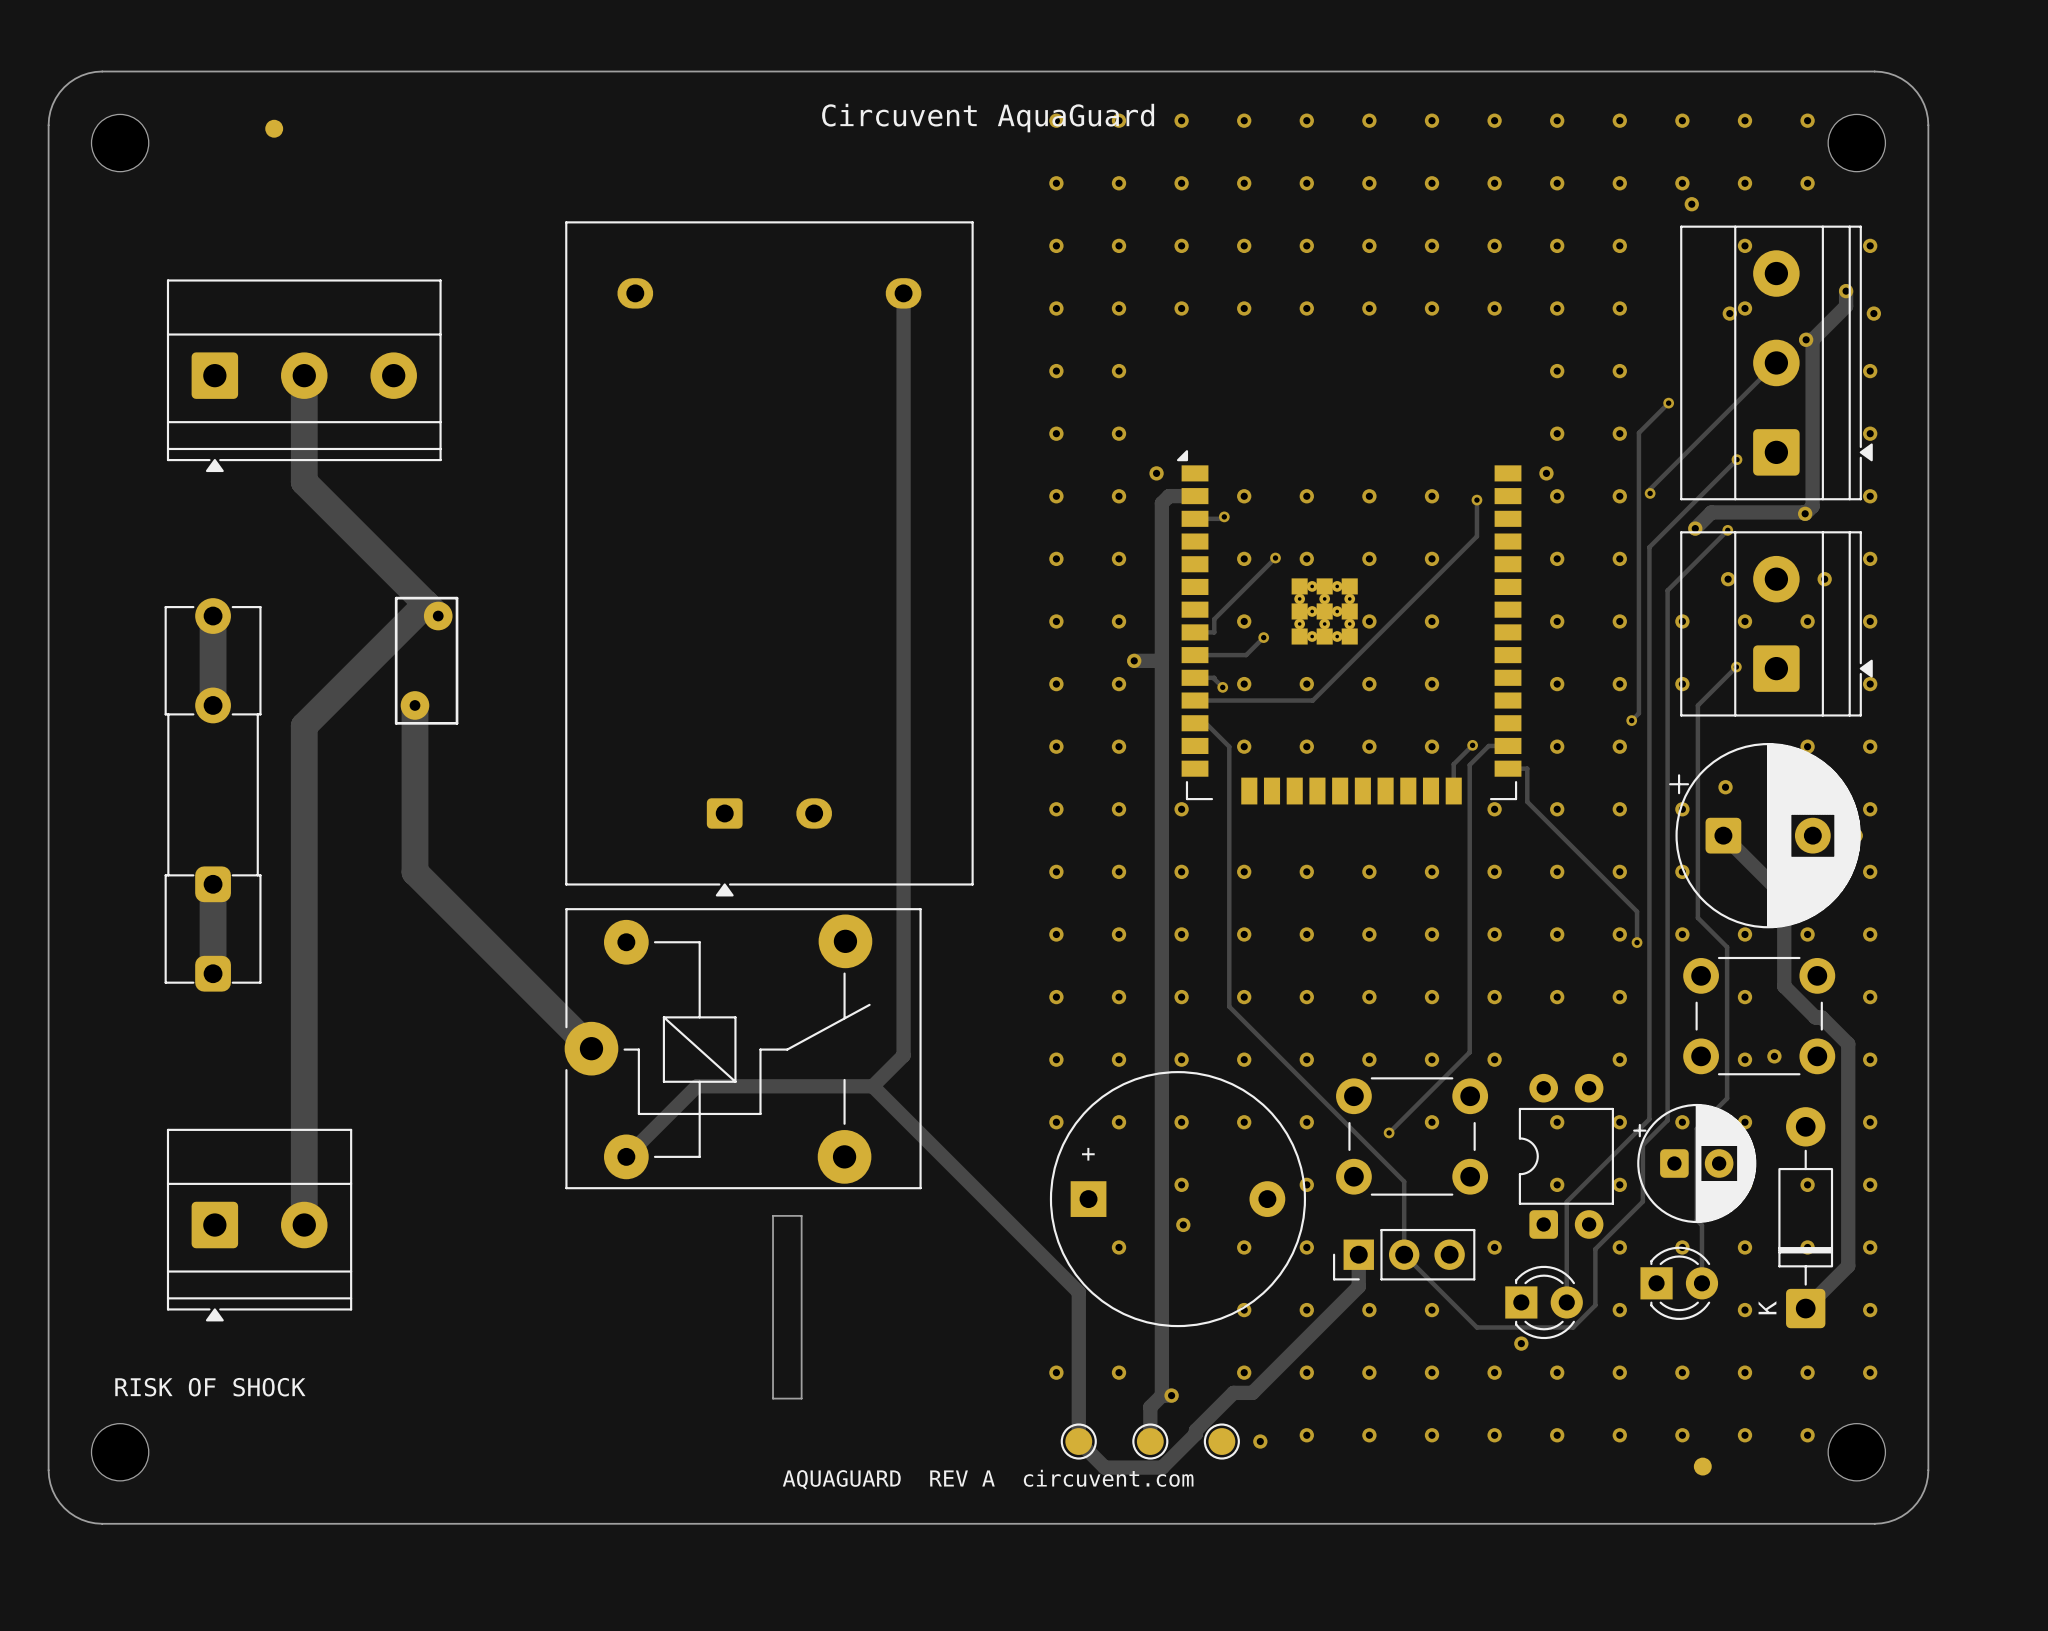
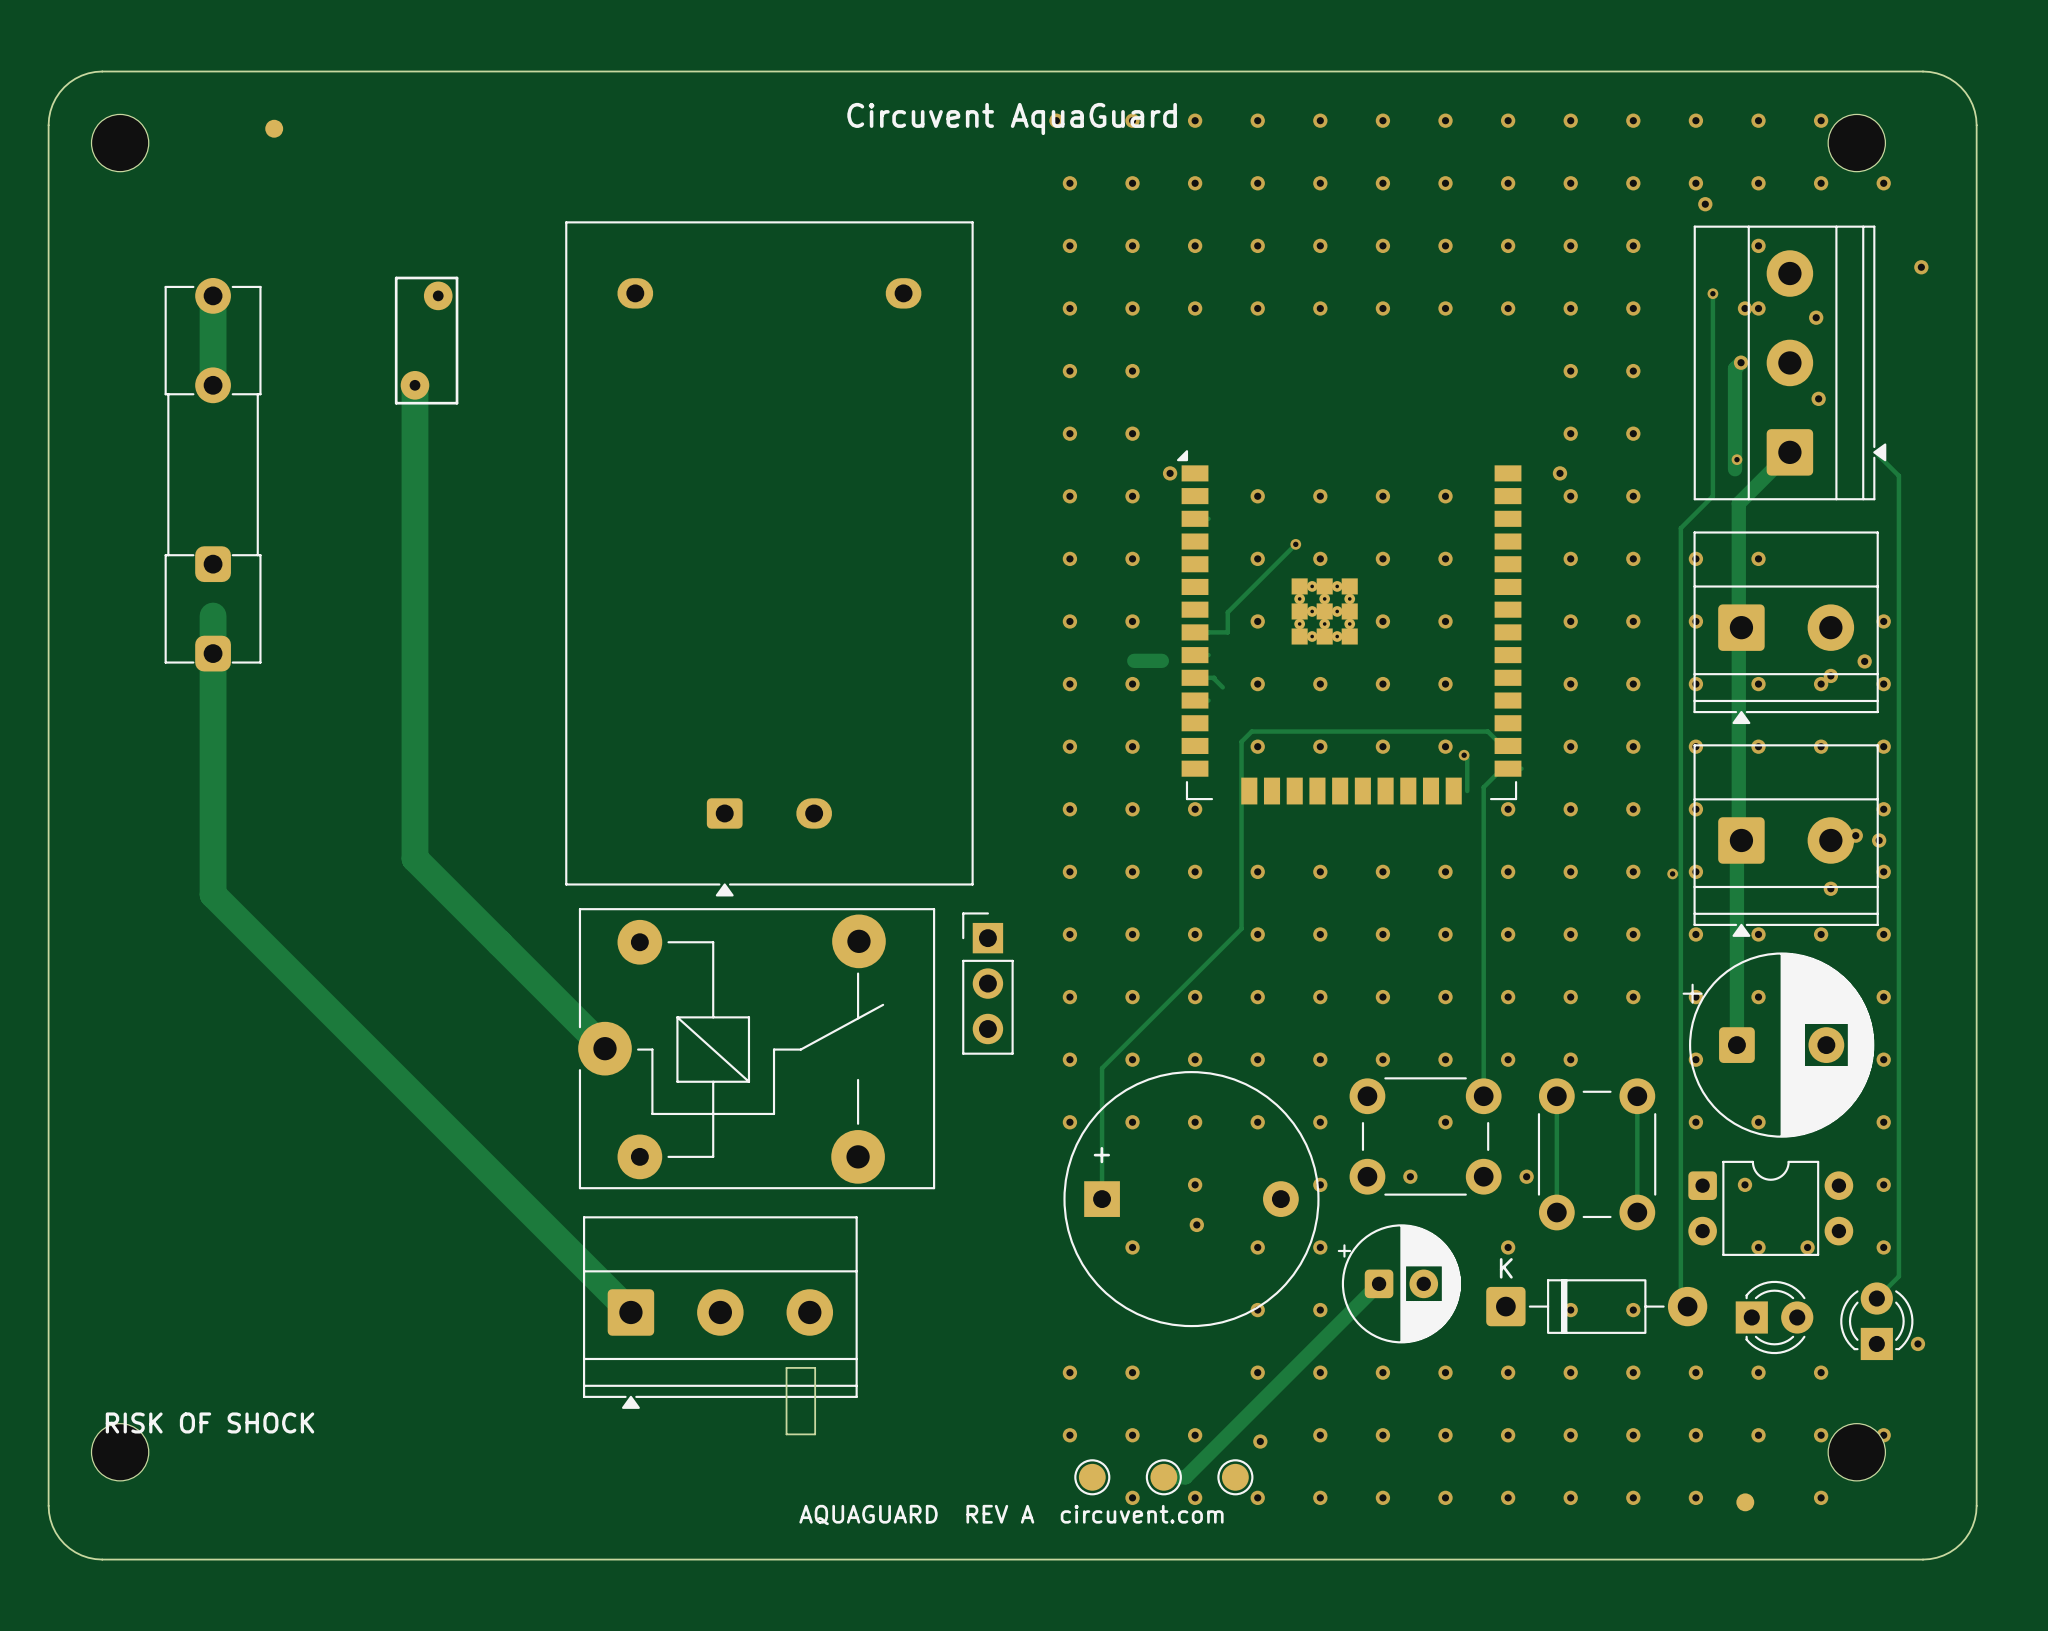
board edge: (1874, 71) (1895, 75) (1912, 87) (1924, 104) (1928, 125) (1928, 1470) (1926, 1484) (1921, 1496) (1907, 1512) (1888, 1521) (1874, 1523) (102, 1523) (81, 1519) (64, 1508) (52, 1490) (48, 1470) -> (1874, 71) (1929, 71) (1949, 78) (1960, 87) (1969, 98) (1974, 111) (1976, 125) (1976, 1505) (1972, 1526) (1965, 1538) (1955, 1548) (1943, 1555) (1922, 1559) (102, 1559) (88, 1557) (75, 1552) (64, 1543) (55, 1532) (49, 1512) (48, 1470)
text position: Circuvent AquaGuard (988, 118) -> Circuvent AquaGuard (1012, 118)
via position: (1119, 120) -> (1132, 120)
via position: (1181, 120) -> (1195, 120)
via position: (1244, 120) -> (1257, 120)
via position: (1306, 120) -> (1320, 120)
via position: (1369, 120) -> (1382, 120)
via position: (1432, 120) -> (1445, 120)
via position: (1494, 120) -> (1508, 120)
via position: (1557, 120) -> (1570, 120)
via position: (1619, 120) -> (1633, 120)
via position: (1682, 120) -> (1695, 120)
via position: (1744, 120) -> (1758, 120)
via position: (1807, 120) -> (1821, 120)
via position: (1056, 183) -> (1069, 183)
via position: (1119, 183) -> (1132, 183)
via position: (1181, 183) -> (1195, 183)
via position: (1244, 183) -> (1257, 183)
via position: (1306, 183) -> (1320, 183)
via position: (1369, 183) -> (1382, 183)
via position: (1432, 183) -> (1445, 183)
via position: (1494, 183) -> (1508, 183)
via position: (1557, 183) -> (1570, 183)
via position: (1619, 183) -> (1633, 183)
via position: (1682, 183) -> (1695, 183)
via position: (1744, 183) -> (1758, 183)
via position: (1807, 183) -> (1821, 183)
via: none -> (1883, 183)
via position: (1691, 204) -> (1705, 204)
via position: (1056, 245) -> (1069, 245)
via position: (1119, 245) -> (1132, 245)
via position: (1181, 245) -> (1195, 245)
via position: (1244, 245) -> (1257, 245)
via position: (1306, 245) -> (1320, 245)
via position: (1369, 245) -> (1382, 245)
via position: (1432, 245) -> (1445, 245)
via position: (1494, 245) -> (1508, 245)
via position: (1557, 245) -> (1570, 245)
via position: (1619, 245) -> (1633, 245)
via position: (1744, 245) -> (1758, 245)
via: (1870, 245) -> none
via: none -> (1921, 267)
track: (1846, 291) (1846, 306) (1812, 339) -> none
via: (1846, 291) -> none
track: (903, 293) (903, 1055) (872, 1086) -> none
track: none -> (1712, 293) (1712, 496) (1680, 528) (1680, 1299) (1687, 1306)
via: none -> (1712, 293)
track: none -> (213, 295) (213, 385)
via position: (1056, 308) -> (1069, 308)
via position: (1119, 308) -> (1132, 308)
via position: (1181, 308) -> (1195, 308)
via position: (1244, 308) -> (1257, 308)
via position: (1306, 308) -> (1320, 308)
via position: (1369, 308) -> (1382, 308)
via position: (1432, 308) -> (1445, 308)
via position: (1494, 308) -> (1508, 308)
via position: (1557, 308) -> (1570, 308)
via position: (1619, 308) -> (1633, 308)
via: none -> (1758, 308)
via: (1729, 313) -> none
via: (1873, 313) -> none
via: none -> (1816, 317)
via: (1806, 339) -> none
track: (1812, 339) (1812, 506) (1805, 513) (1711, 512) (1695, 528) -> none
track: none -> (1741, 362) (1735, 368) (1735, 469)
via: none -> (1741, 362)
track: (1776, 362) (1650, 489) (1650, 493) -> none
part position: (1776, 362) -> (1789, 362)
via position: (1056, 371) -> (1069, 371)
via position: (1119, 371) -> (1132, 371)
via position: (1557, 371) -> (1570, 371)
via position: (1619, 371) -> (1633, 371)
via: (1870, 371) -> none
track: (304, 375) (304, 482) (438, 616) -> none
part: (304, 375) -> none
track: none -> (414, 385) (414, 705)
via: none -> (1818, 398)
track: (1668, 403) (1638, 432) (1638, 713) (1631, 720) -> none
via: (1668, 403) -> none
via position: (1056, 433) -> (1069, 433)
via position: (1119, 433) -> (1132, 433)
via position: (1557, 433) -> (1570, 433)
via position: (1619, 433) -> (1633, 433)
via: (1870, 433) -> none
track: none -> (1789, 452) (1738, 503) (1738, 837) (1741, 840) (1736, 844) (1736, 1045)
track: none -> (1877, 454) (1898, 475) (1898, 1276) (1876, 1298)
track: (1737, 459) (1649, 547) (1649, 1119) (1566, 1201) (1566, 1302) -> none
via position: (1156, 473) -> (1170, 473)
via position: (1546, 473) -> (1559, 473)
via: (1650, 493) -> none
via position: (1056, 496) -> (1069, 496)
via position: (1119, 496) -> (1132, 496)
track: (1195, 496) (1169, 496) (1161, 503) (1161, 1395) -> none
via position: (1244, 496) -> (1257, 496)
via position: (1306, 496) -> (1320, 496)
via position: (1369, 496) -> (1382, 496)
via position: (1432, 496) -> (1445, 496)
via position: (1557, 496) -> (1570, 496)
via position: (1619, 496) -> (1633, 496)
via: (1870, 496) -> none
track: (1476, 500) (1476, 536) (1312, 700) (1208, 700) -> none
via: (1476, 500) -> none
via: (1805, 513) -> none
track: (1224, 516) (1222, 518) (1208, 518) -> none
via: (1224, 516) -> none
via: (1695, 528) -> none
track: (1727, 530) (1667, 590) (1667, 1120) (1642, 1145) (1642, 1201) (1595, 1249) (1595, 1305) (1573, 1327) (1476, 1327) (1404, 1254) (1404, 1181) (1229, 1006) (1229, 746) (1205, 723) (1195, 723) -> none
via: (1727, 530) -> none
via position: (1056, 558) -> (1069, 558)
via position: (1119, 558) -> (1132, 558)
via position: (1244, 558) -> (1257, 558)
track: (1275, 558) (1214, 619) (1214, 632) -> (1295, 544) (1227, 612) (1227, 632) (1214, 632)
via position: (1275, 558) -> (1295, 544)
via position: (1306, 558) -> (1320, 558)
via position: (1369, 558) -> (1382, 558)
via position: (1432, 558) -> (1445, 558)
via position: (1557, 558) -> (1570, 558)
via position: (1619, 558) -> (1633, 558)
via: none -> (1695, 558)
via: none -> (1758, 558)
via: (1870, 558) -> none
via: (1728, 579) -> none
via: (1824, 579) -> none
track: (426, 603) (304, 725) (304, 1225) -> none
via position: (1056, 621) -> (1069, 621)
via position: (1119, 621) -> (1132, 621)
via position: (1244, 621) -> (1257, 621)
via position: (1369, 621) -> (1382, 621)
via position: (1432, 621) -> (1445, 621)
via position: (1557, 621) -> (1570, 621)
via position: (1619, 621) -> (1633, 621)
via position: (1682, 621) -> (1695, 621)
via: (1744, 621) -> none
via: (1807, 621) -> none
via position: (1870, 621) -> (1883, 621)
part rotation: 0° (1776, 623) -> 90° clockwise (1786, 627)
track: (1263, 637) (1246, 655) (1208, 655) -> none
via: (1263, 637) -> none
part position: (426, 660) -> (426, 340)
via: (1134, 660) -> none
via: none -> (1864, 661)
track: (1736, 667) (1697, 705) (1697, 917) (1727, 947) (1727, 1098) (1696, 1128) (1696, 1220) (1701, 1225) (1701, 1283) -> none
via: (1736, 667) -> none
via: none -> (1830, 675)
via position: (1056, 684) -> (1069, 684)
via position: (1119, 684) -> (1132, 684)
via position: (1244, 684) -> (1257, 684)
via position: (1306, 684) -> (1320, 684)
via position: (1369, 684) -> (1382, 684)
via position: (1432, 684) -> (1445, 684)
via position: (1557, 684) -> (1570, 684)
via position: (1619, 684) -> (1633, 684)
via position: (1682, 684) -> (1695, 684)
via: none -> (1758, 684)
via: none -> (1821, 684)
via position: (1870, 684) -> (1883, 684)
via: (1222, 687) -> none
track: none -> (213, 705) (213, 884)
via: (1631, 720) -> none
track: (1472, 745) (1453, 764) (1453, 791) -> none
via position: (1472, 745) -> (1464, 755)
track: (1502, 745) (1488, 745) (1469, 764) (1469, 1052) (1389, 1132) -> (1502, 745) (1487, 731) (1251, 731) (1241, 741) (1241, 928) (1102, 1068) (1102, 1199)
via position: (1056, 746) -> (1069, 746)
via position: (1119, 746) -> (1132, 746)
via position: (1244, 746) -> (1257, 746)
via position: (1306, 746) -> (1320, 746)
via position: (1369, 746) -> (1382, 746)
via position: (1432, 746) -> (1445, 746)
via position: (1557, 746) -> (1570, 746)
via position: (1619, 746) -> (1633, 746)
via: none -> (1695, 746)
via: none -> (1758, 746)
via position: (1807, 746) -> (1821, 746)
via position: (1870, 746) -> (1883, 746)
track: none -> (1464, 755) (1467, 758) (1467, 791)
track: none -> (1508, 768) (1502, 768) (1483, 787) (1483, 1096)
track: (1521, 768) (1527, 768) (1527, 801) (1637, 911) (1637, 942) -> none
via: (1725, 787) -> none
part position: (213, 794) -> (213, 474)
via position: (1056, 809) -> (1069, 809)
via position: (1119, 809) -> (1132, 809)
via position: (1181, 809) -> (1195, 809)
via position: (1494, 809) -> (1508, 809)
via position: (1557, 809) -> (1570, 809)
via position: (1619, 809) -> (1633, 809)
via position: (1682, 809) -> (1695, 809)
via position: (1870, 809) -> (1883, 809)
track: (1723, 835) (1784, 896) (1784, 986) (1815, 1017) (1821, 1017) (1848, 1043) (1848, 1266) (1805, 1308) -> none
part position: (1764, 835) -> (1778, 1045)
part: none -> (1786, 840)
via: none -> (1879, 840)
track: (414, 858) (414, 872) (591, 1048) -> (414, 858) (605, 1048)
via position: (1056, 871) -> (1069, 871)
via position: (1119, 871) -> (1132, 871)
via position: (1181, 871) -> (1195, 871)
via position: (1244, 871) -> (1257, 871)
via position: (1306, 871) -> (1320, 871)
via position: (1369, 871) -> (1382, 871)
via position: (1432, 871) -> (1445, 871)
via position: (1494, 871) -> (1508, 871)
via position: (1557, 871) -> (1570, 871)
via position: (1619, 871) -> (1633, 871)
via position: (1682, 871) -> (1695, 871)
via position: (1870, 871) -> (1883, 871)
via: none -> (1830, 888)
track: (213, 894) (213, 973) -> (213, 894) (630, 1312)
via position: (1056, 934) -> (1069, 934)
via position: (1119, 934) -> (1132, 934)
via position: (1181, 934) -> (1195, 934)
via position: (1244, 934) -> (1257, 934)
via position: (1306, 934) -> (1320, 934)
via position: (1369, 934) -> (1382, 934)
via position: (1432, 934) -> (1445, 934)
via position: (1494, 934) -> (1508, 934)
via position: (1557, 934) -> (1570, 934)
via position: (1619, 934) -> (1633, 934)
via position: (1682, 934) -> (1695, 934)
via position: (1744, 934) -> (1758, 934)
via position: (1807, 934) -> (1821, 934)
via position: (1870, 934) -> (1883, 934)
via position: (1637, 942) -> (1672, 873)
part: none -> (987, 983)
via position: (1056, 997) -> (1069, 997)
via position: (1119, 997) -> (1132, 997)
via position: (1181, 997) -> (1195, 997)
via position: (1244, 997) -> (1257, 997)
via position: (1306, 997) -> (1320, 997)
via position: (1369, 997) -> (1382, 997)
via position: (1432, 997) -> (1445, 997)
via position: (1494, 997) -> (1508, 997)
via position: (1557, 997) -> (1570, 997)
via position: (1619, 997) -> (1633, 997)
via: none -> (1695, 997)
via position: (1744, 997) -> (1758, 997)
via position: (1870, 997) -> (1883, 997)
part rotation: 0° (1759, 1016) -> 90° clockwise (1597, 1154)
part position: (1759, 1016) -> (1597, 1154)
part position: (743, 1048) -> (756, 1048)
via: (1774, 1056) -> none
via position: (1056, 1059) -> (1069, 1059)
via position: (1119, 1059) -> (1132, 1059)
via position: (1181, 1059) -> (1195, 1059)
via position: (1244, 1059) -> (1257, 1059)
via position: (1306, 1059) -> (1320, 1059)
via position: (1369, 1059) -> (1382, 1059)
via position: (1432, 1059) -> (1445, 1059)
via position: (1494, 1059) -> (1508, 1059)
via: none -> (1570, 1059)
via: (1619, 1059) -> none
via: none -> (1695, 1059)
via: (1744, 1059) -> none
via position: (1870, 1059) -> (1883, 1059)
track: (872, 1086) (1078, 1292) (1078, 1441) (1104, 1467) (1162, 1467) (1233, 1392) (1252, 1392) (1358, 1286) (1358, 1254) -> none
track: (872, 1086) (696, 1086) (626, 1156) -> none
track: none -> (1556, 1096) (1556, 1212)
track: none -> (1637, 1096) (1637, 1212)
via position: (1056, 1122) -> (1069, 1122)
via position: (1119, 1122) -> (1132, 1122)
via position: (1181, 1122) -> (1195, 1122)
via position: (1244, 1122) -> (1257, 1122)
via position: (1306, 1122) -> (1320, 1122)
via position: (1432, 1122) -> (1445, 1122)
via: (1557, 1122) -> none
via: (1619, 1122) -> none
via position: (1682, 1122) -> (1695, 1122)
via position: (1744, 1122) -> (1758, 1122)
via position: (1870, 1122) -> (1883, 1122)
via: (1389, 1132) -> none
part position: (1412, 1136) -> (1425, 1136)
part rotation: 0° (1566, 1156) -> 90° clockwise (1770, 1208)
part position: (1566, 1156) -> (1770, 1208)
part position: (1694, 1163) -> (1399, 1283)
via: none -> (1410, 1176)
via: none -> (1526, 1176)
via position: (1181, 1184) -> (1195, 1184)
via position: (1306, 1184) -> (1320, 1184)
via: (1557, 1184) -> none
via: (1619, 1184) -> none
via: (1807, 1184) -> none
via position: (1870, 1184) -> (1883, 1184)
part position: (1177, 1199) -> (1191, 1199)
board edge: (773, 1215) (801, 1215) (801, 1398) (773, 1398) (773, 1215) -> none
part rotation: 0° (1805, 1217) -> 90° clockwise (1596, 1306)
part position: (1805, 1217) -> (1596, 1306)
via position: (1183, 1224) -> (1196, 1224)
part: (259, 1225) -> none
via position: (1119, 1247) -> (1132, 1247)
via position: (1244, 1247) -> (1257, 1247)
via position: (1306, 1247) -> (1320, 1247)
via position: (1494, 1247) -> (1508, 1247)
via: (1619, 1247) -> none
via: (1682, 1247) -> none
via position: (1744, 1247) -> (1758, 1247)
via position: (1870, 1247) -> (1883, 1247)
part: (1404, 1254) -> none
track: none -> (1379, 1283) (1185, 1477) (1163, 1477)
part: (1679, 1283) -> none
part: (1544, 1302) -> none
via position: (1244, 1310) -> (1257, 1310)
via position: (1306, 1310) -> (1320, 1310)
via: (1369, 1310) -> none
via: none -> (1570, 1310)
via position: (1619, 1310) -> (1633, 1310)
via: (1744, 1310) -> none
via: (1870, 1310) -> none
part: none -> (720, 1312)
part: none -> (1774, 1317)
part: none -> (1876, 1321)
via: (1521, 1343) -> none
via: none -> (1917, 1343)
board edge: none -> (786, 1367) (815, 1367) (815, 1434) (786, 1434) (786, 1367)
via position: (1056, 1372) -> (1069, 1372)
via position: (1119, 1372) -> (1132, 1372)
via position: (1244, 1372) -> (1257, 1372)
via position: (1306, 1372) -> (1320, 1372)
via position: (1369, 1372) -> (1382, 1372)
via position: (1432, 1372) -> (1445, 1372)
via position: (1494, 1372) -> (1508, 1372)
via position: (1557, 1372) -> (1570, 1372)
via position: (1619, 1372) -> (1633, 1372)
via position: (1682, 1372) -> (1695, 1372)
via position: (1744, 1372) -> (1758, 1372)
via position: (1807, 1372) -> (1821, 1372)
via: (1870, 1372) -> none
text position: RISK OF SHOCK (210, 1387) -> RISK OF SHOCK (210, 1422)
track: (1161, 1395) (1150, 1407) (1150, 1441) -> none
via: (1171, 1395) -> none
via: none -> (1069, 1435)
via: none -> (1132, 1435)
via: none -> (1195, 1435)
via position: (1306, 1435) -> (1320, 1435)
via position: (1369, 1435) -> (1382, 1435)
via position: (1432, 1435) -> (1445, 1435)
via position: (1494, 1435) -> (1508, 1435)
via position: (1557, 1435) -> (1570, 1435)
via position: (1619, 1435) -> (1633, 1435)
via position: (1682, 1435) -> (1695, 1435)
via position: (1744, 1435) -> (1758, 1435)
via position: (1807, 1435) -> (1821, 1435)
via: none -> (1883, 1435)
part: (1078, 1441) -> none
part: (1150, 1441) -> none
part: (1221, 1441) -> none
part position: (1702, 1466) -> (1745, 1502)
part: none -> (1092, 1477)
part: none -> (1163, 1477)
part: none -> (1235, 1477)
text position: AQUAGUARD REV A circuvent.com (988, 1479) -> AQUAGUARD REV A circuvent.com (1011, 1515)
via: none -> (1132, 1497)
via: none -> (1195, 1497)
via: none -> (1257, 1497)
via: none -> (1320, 1497)
via: none -> (1382, 1497)
via: none -> (1445, 1497)
via: none -> (1508, 1497)
via: none -> (1570, 1497)
via: none -> (1633, 1497)
via: none -> (1695, 1497)
via: none -> (1821, 1497)

